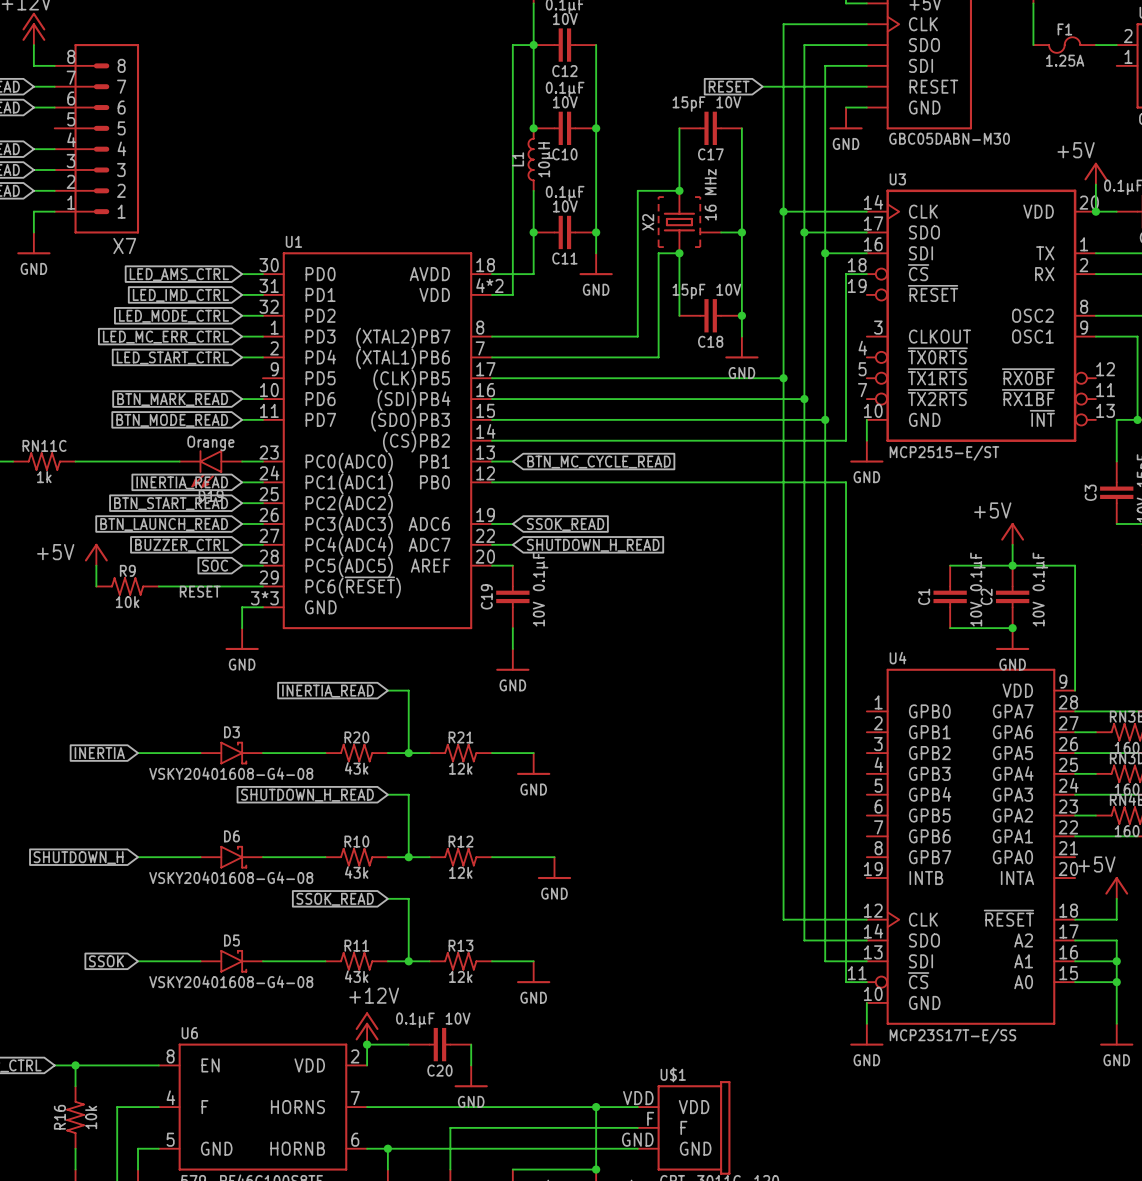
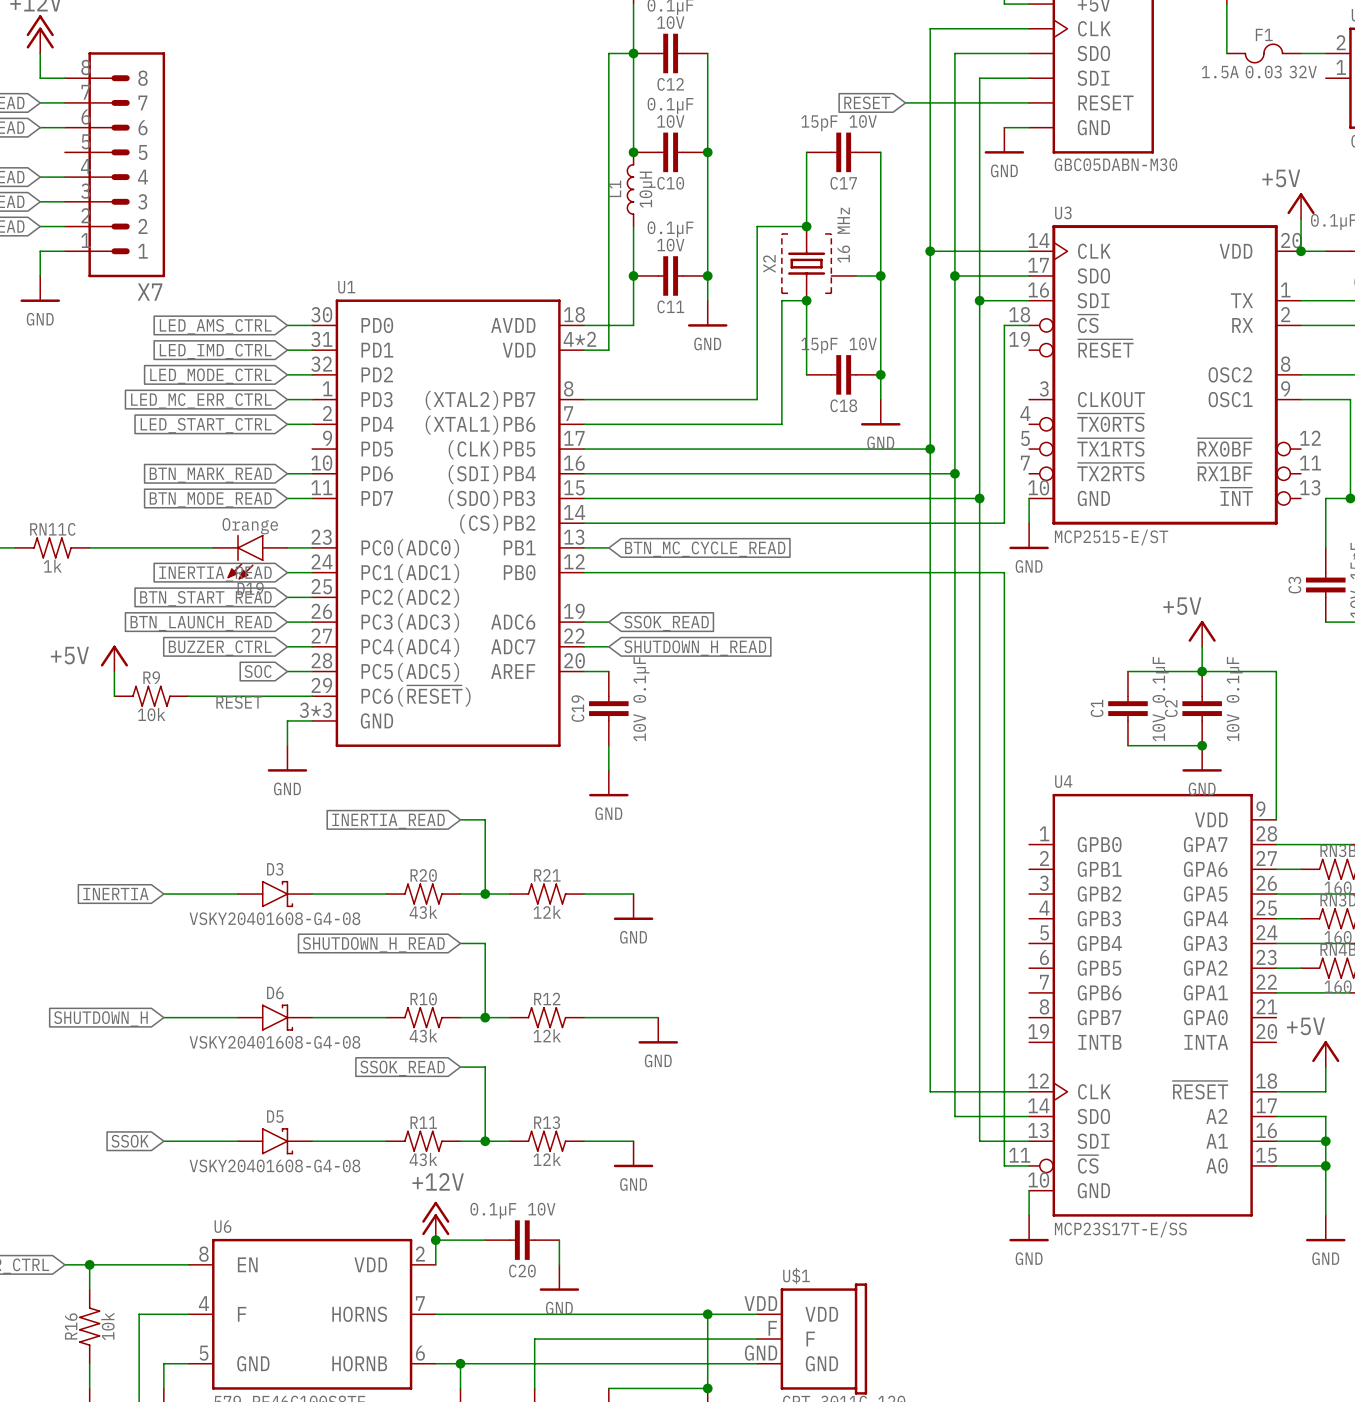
F1 text: none -> 0.03 (1263, 72)
F1 text: 1.25A (1065, 60) -> 1.5A (1220, 72)
F1 text: none -> 32V (1303, 72)

